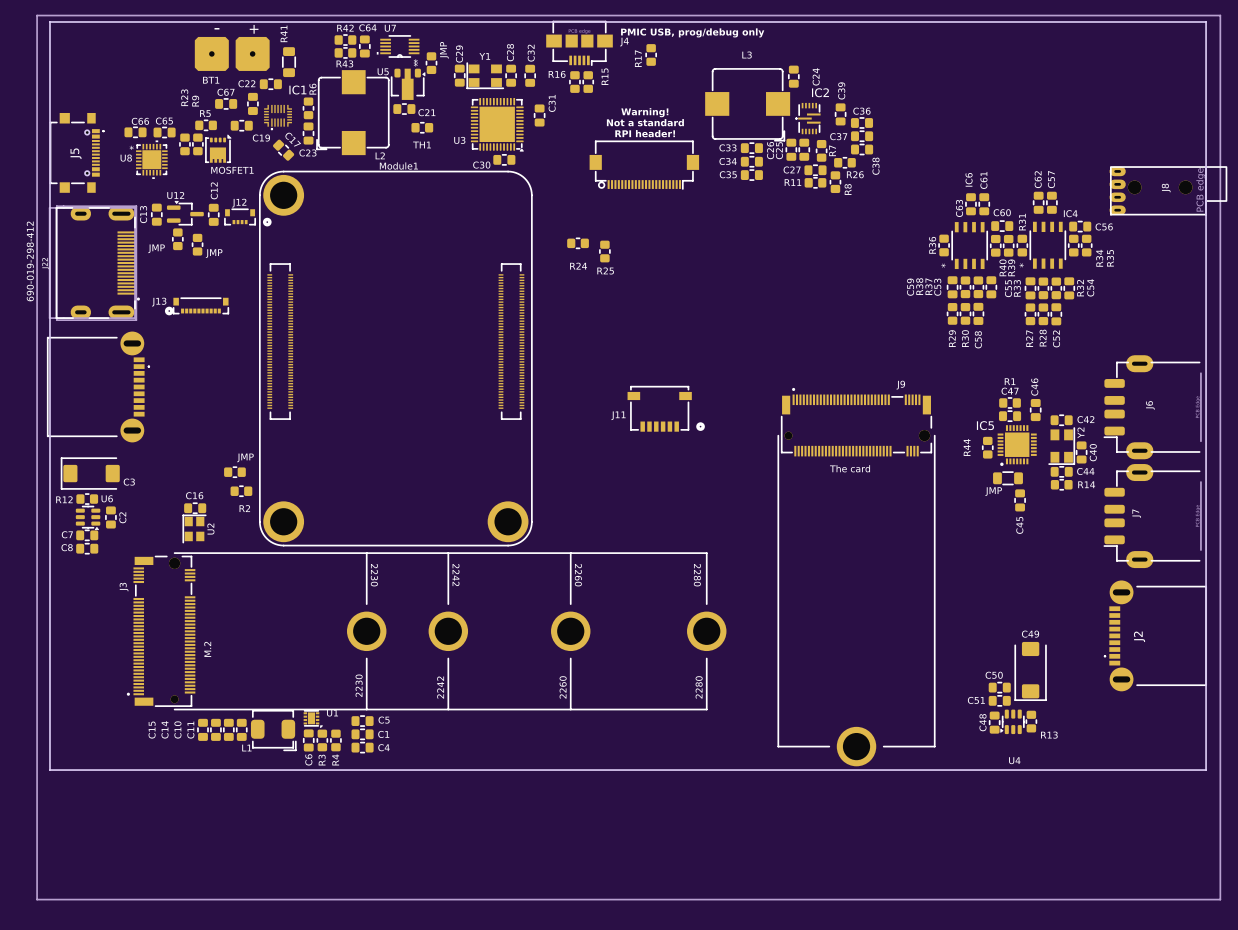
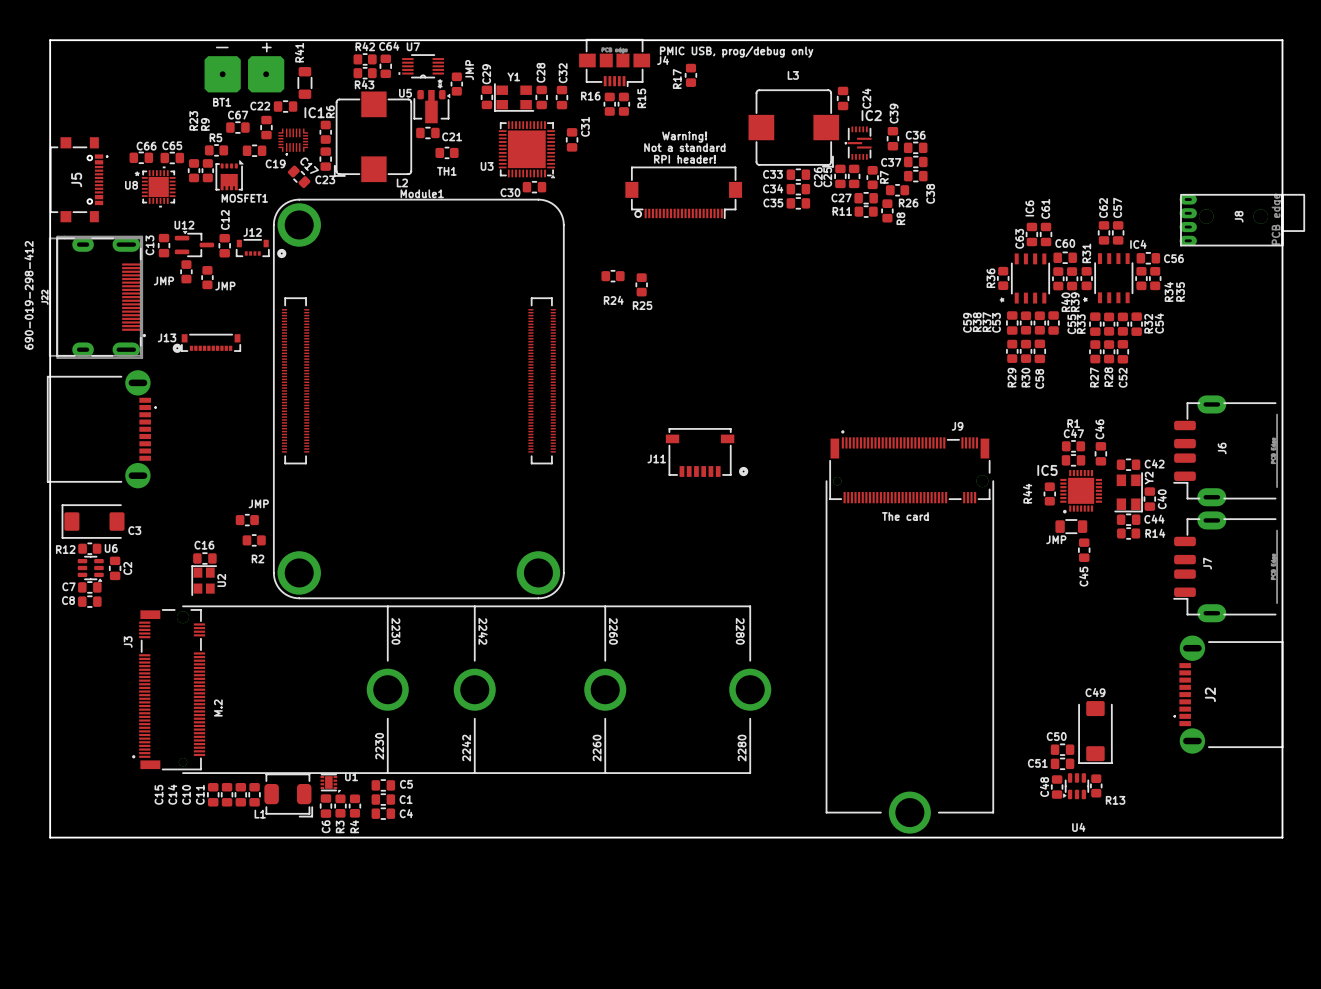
line: (37, 15) (1220, 15) (1220, 899) (37, 899) (37, 15) -> none

